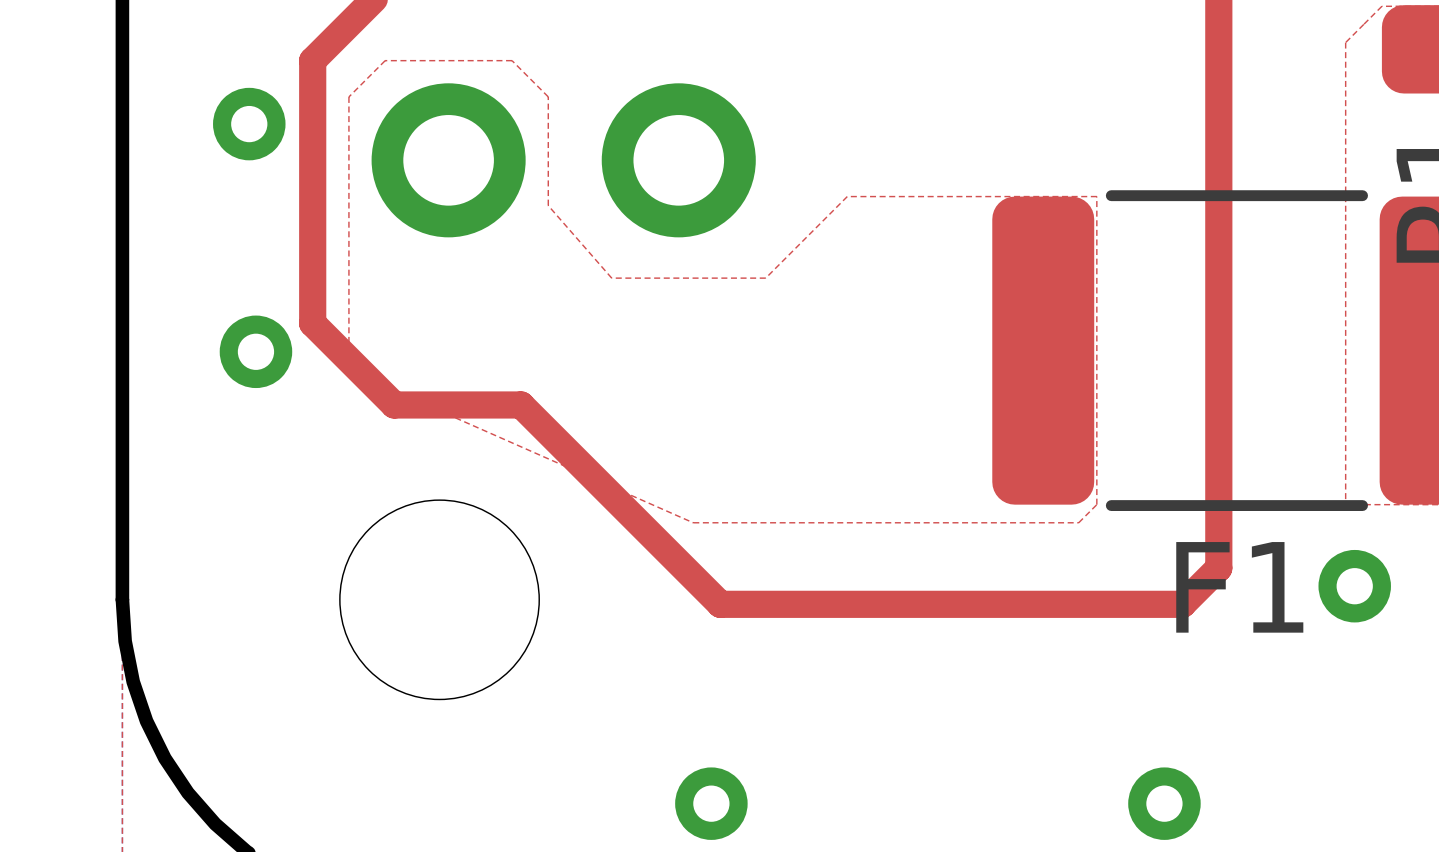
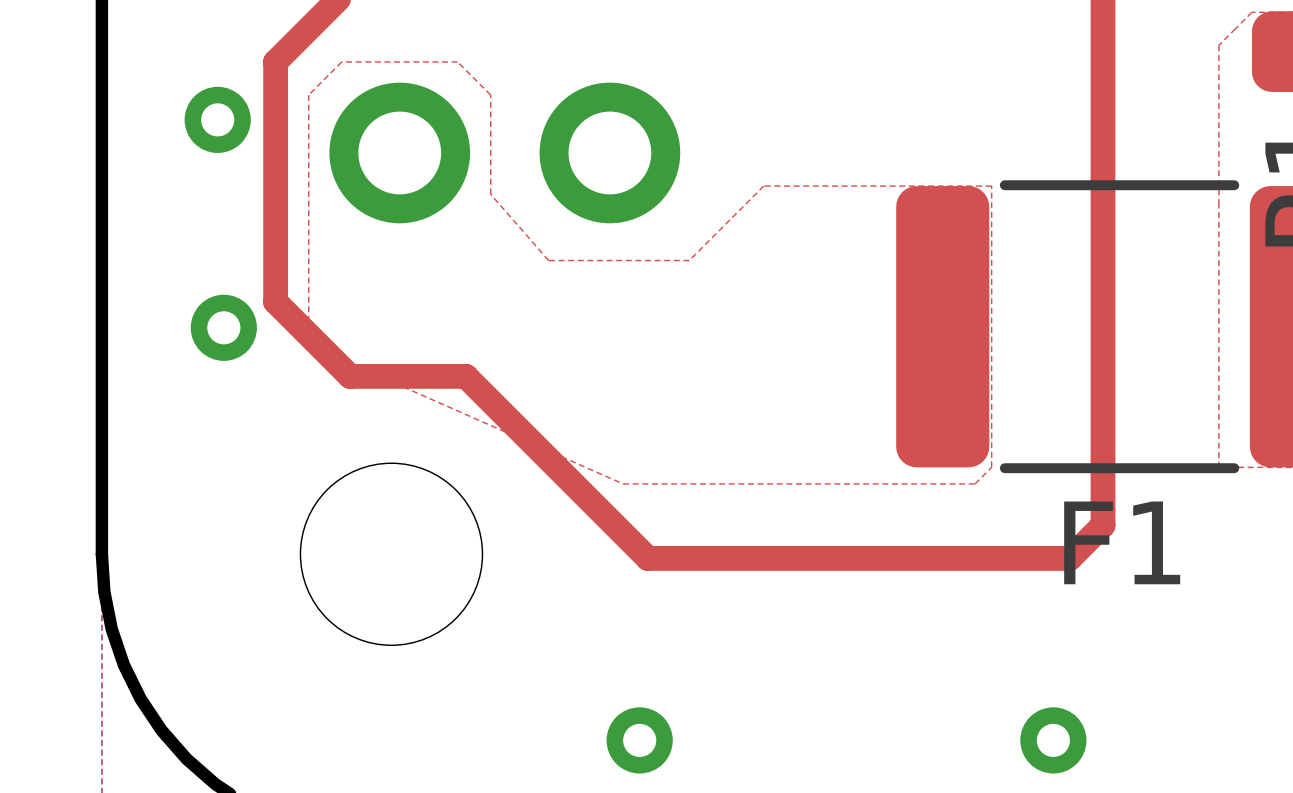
via: (1354, 586) -> none

